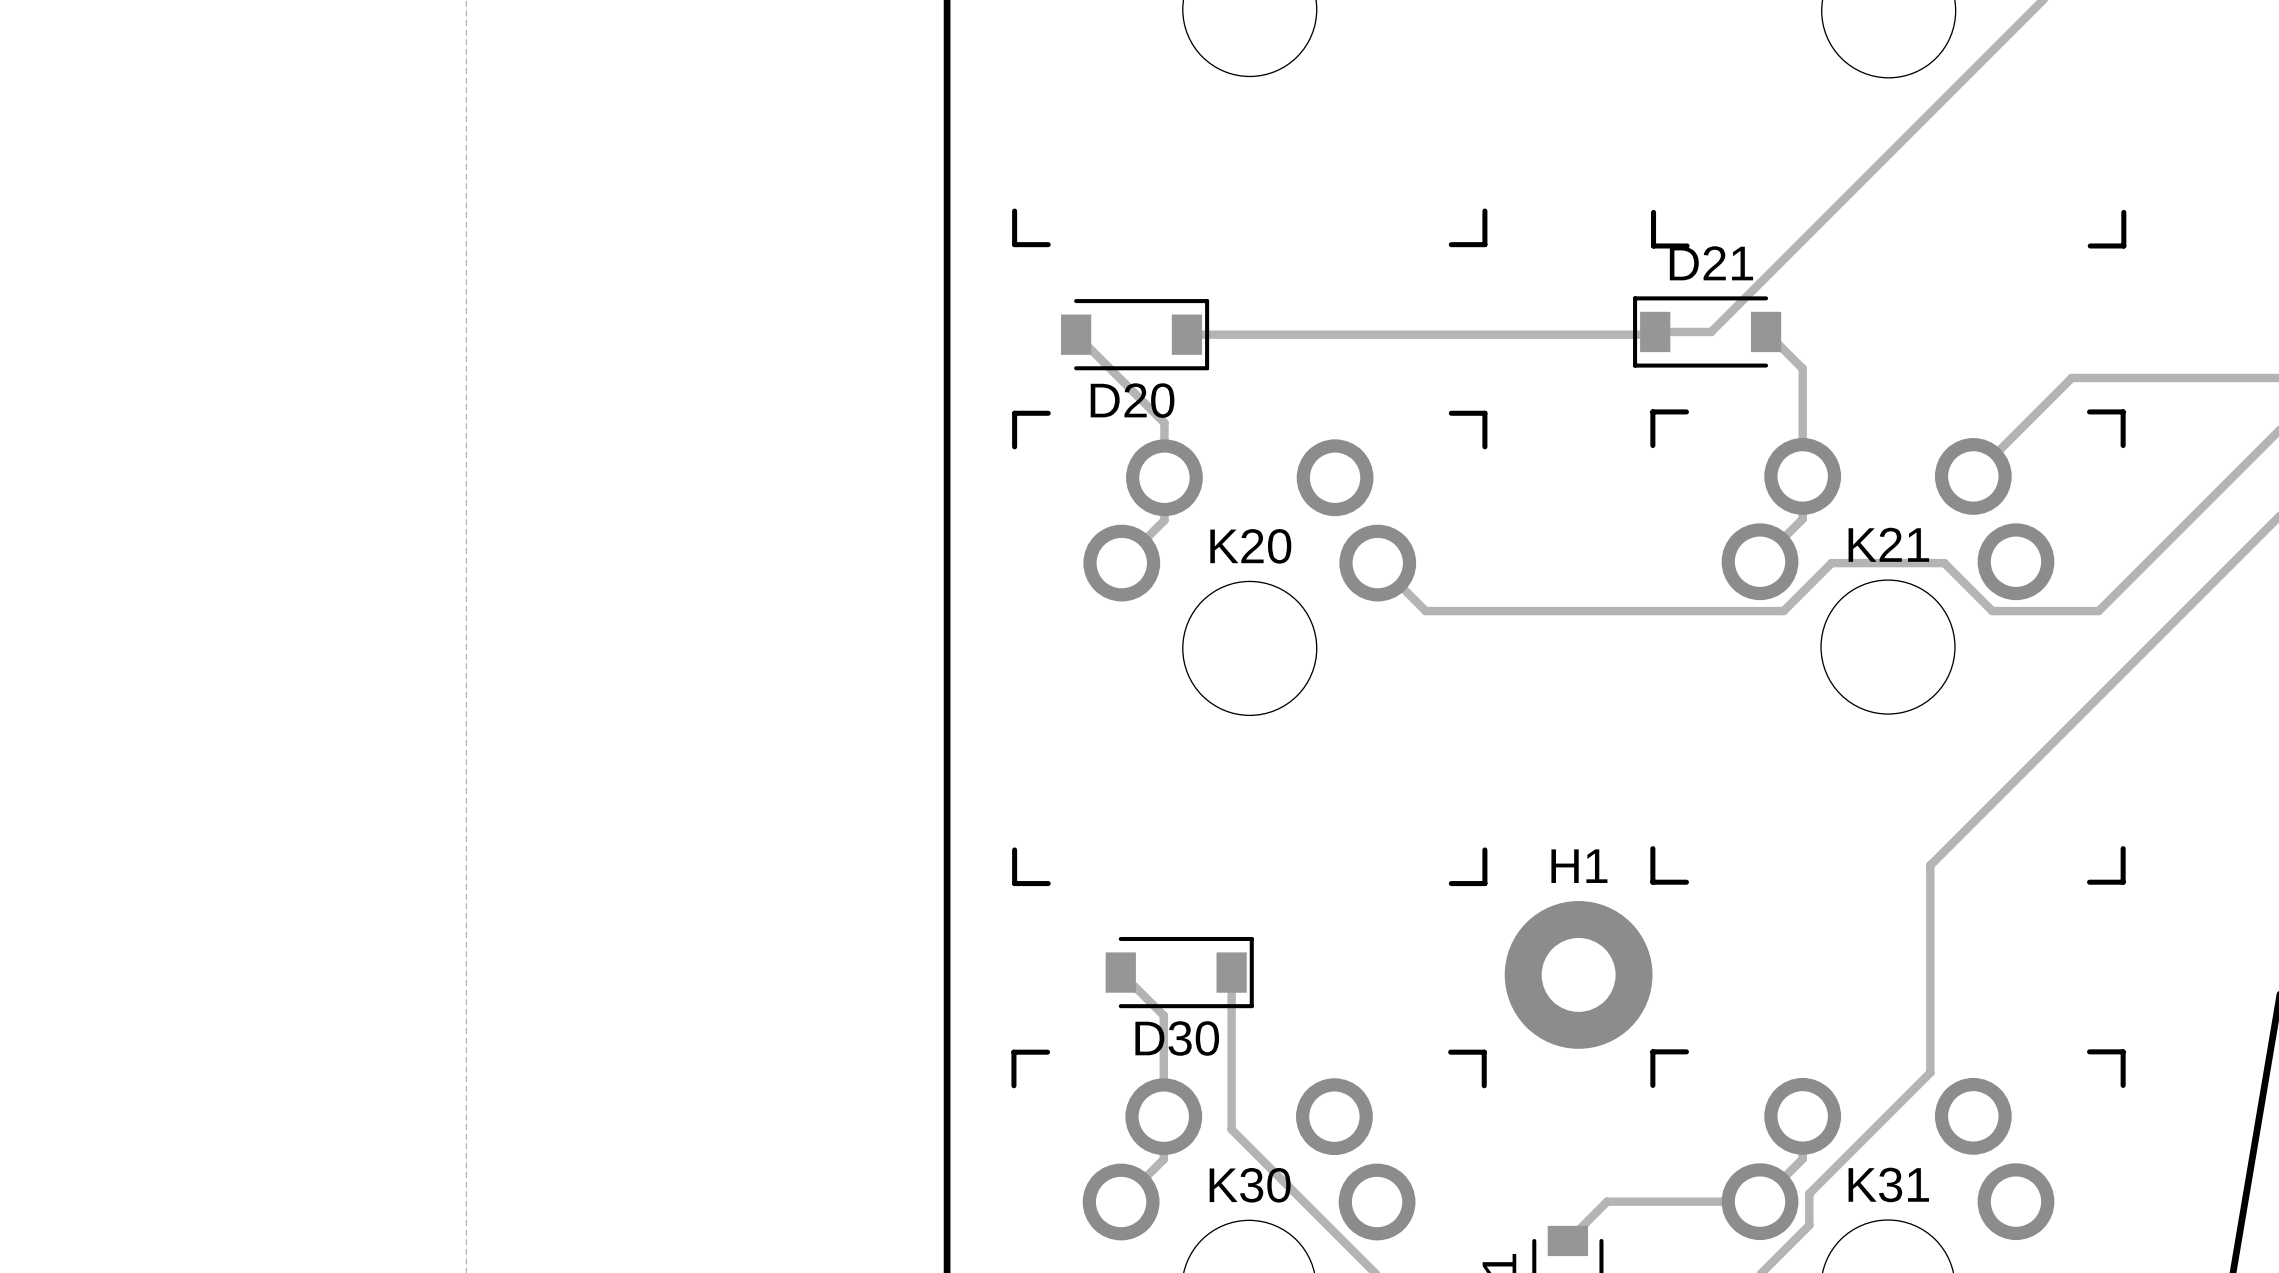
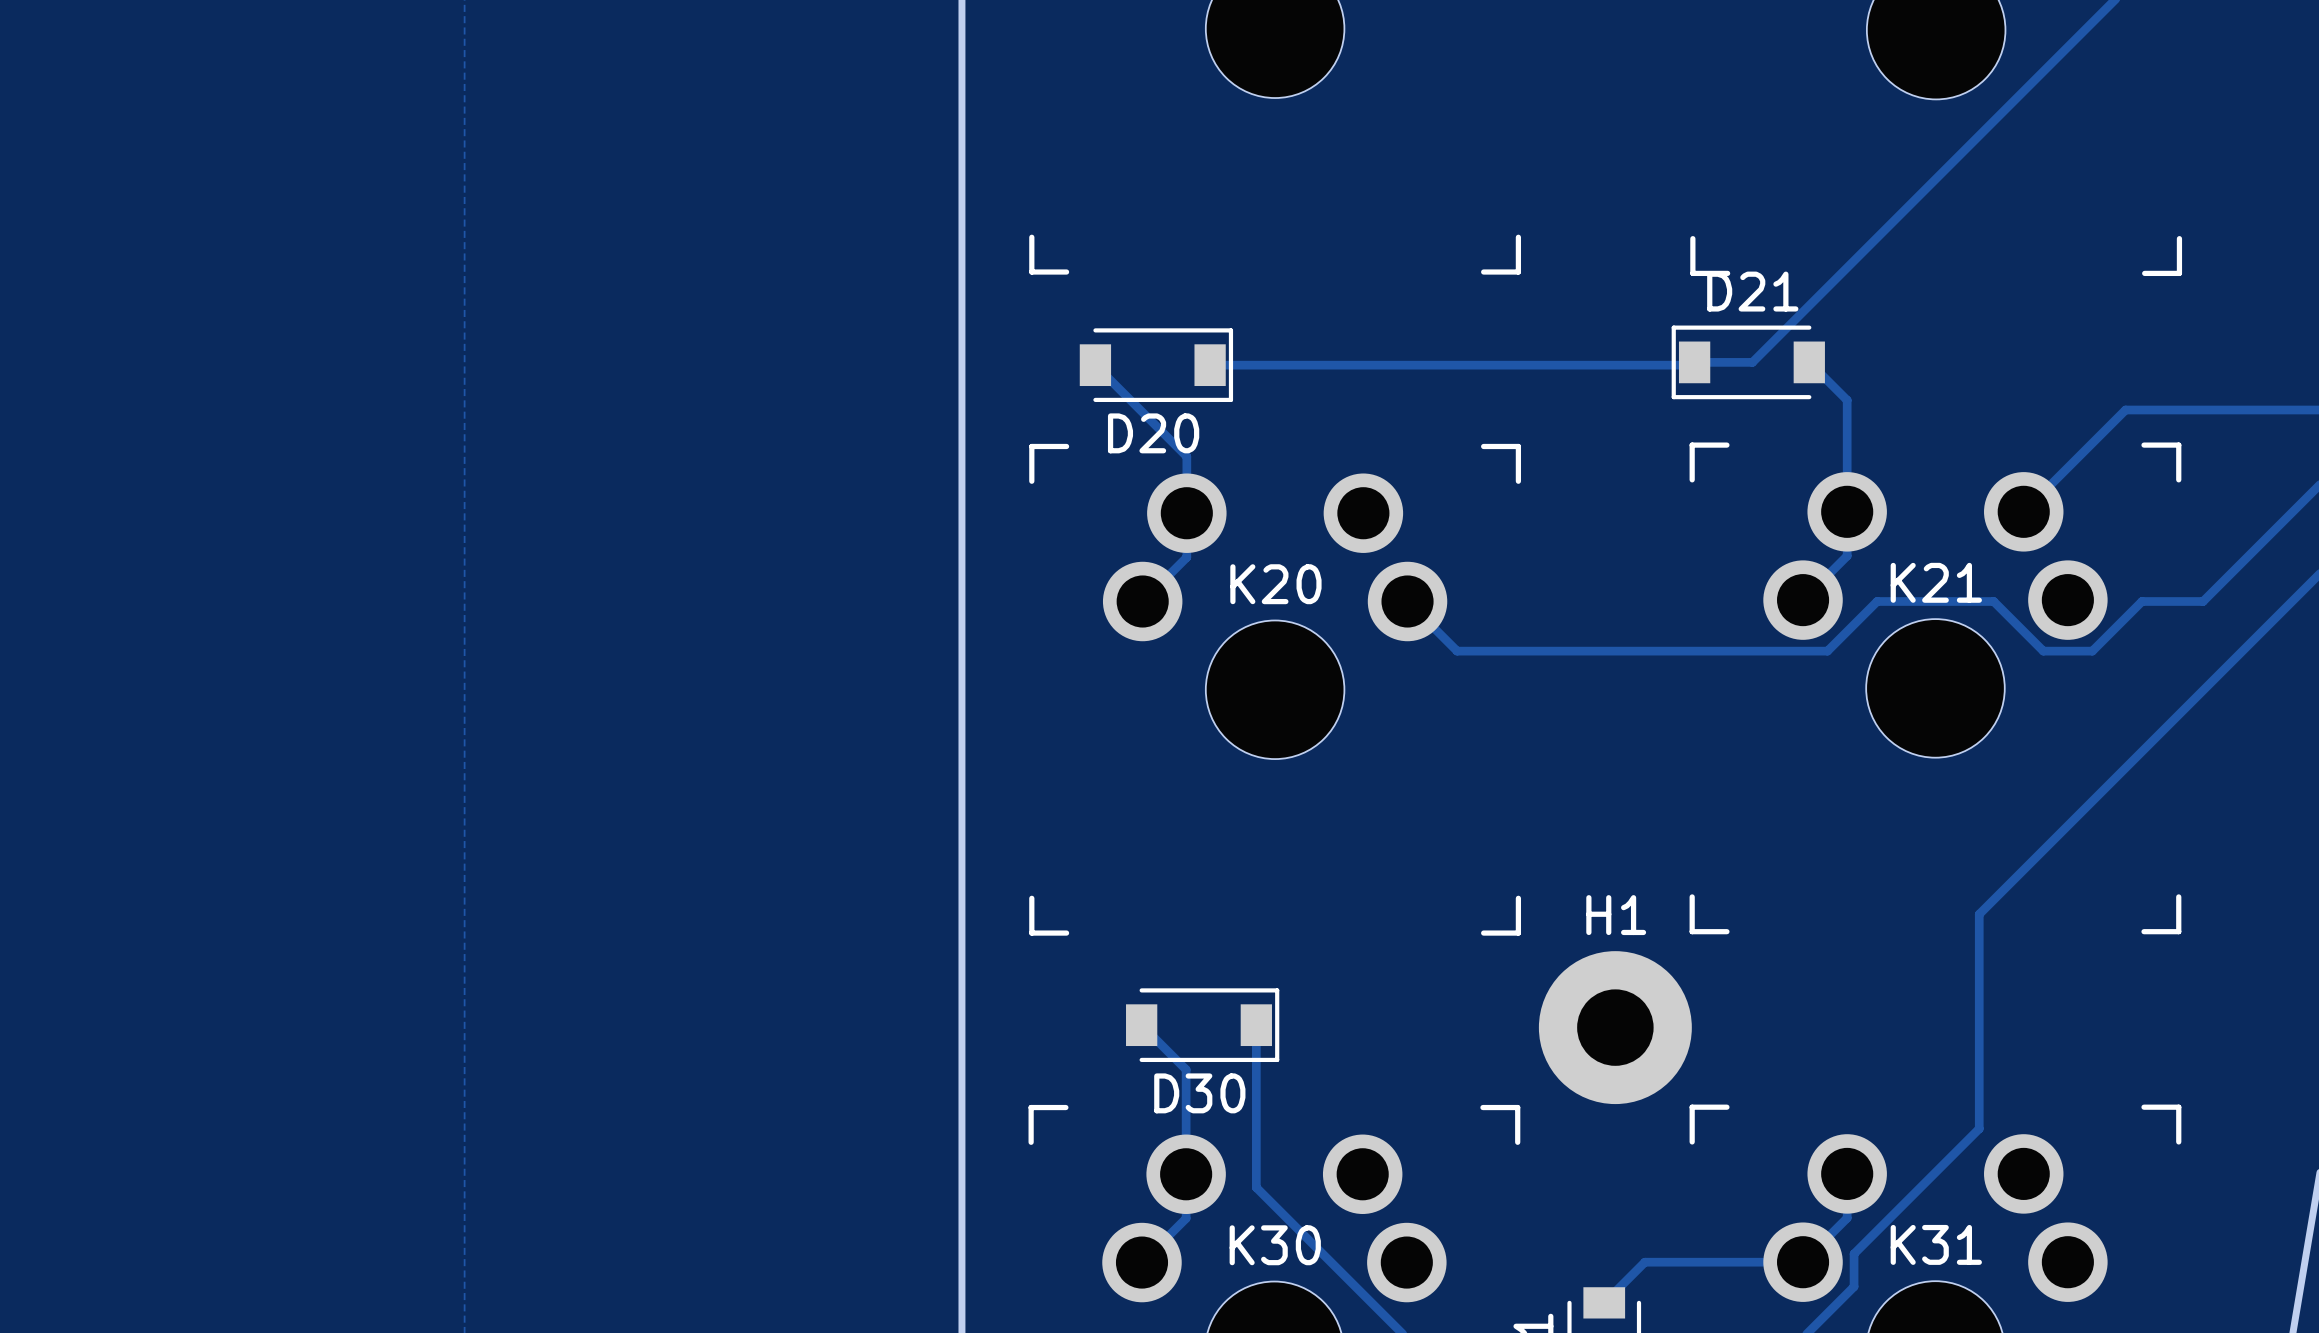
track: (2146, 563) (2098, 611) (2039, 611) -> (2203, 601) (2142, 601) (2092, 651)

